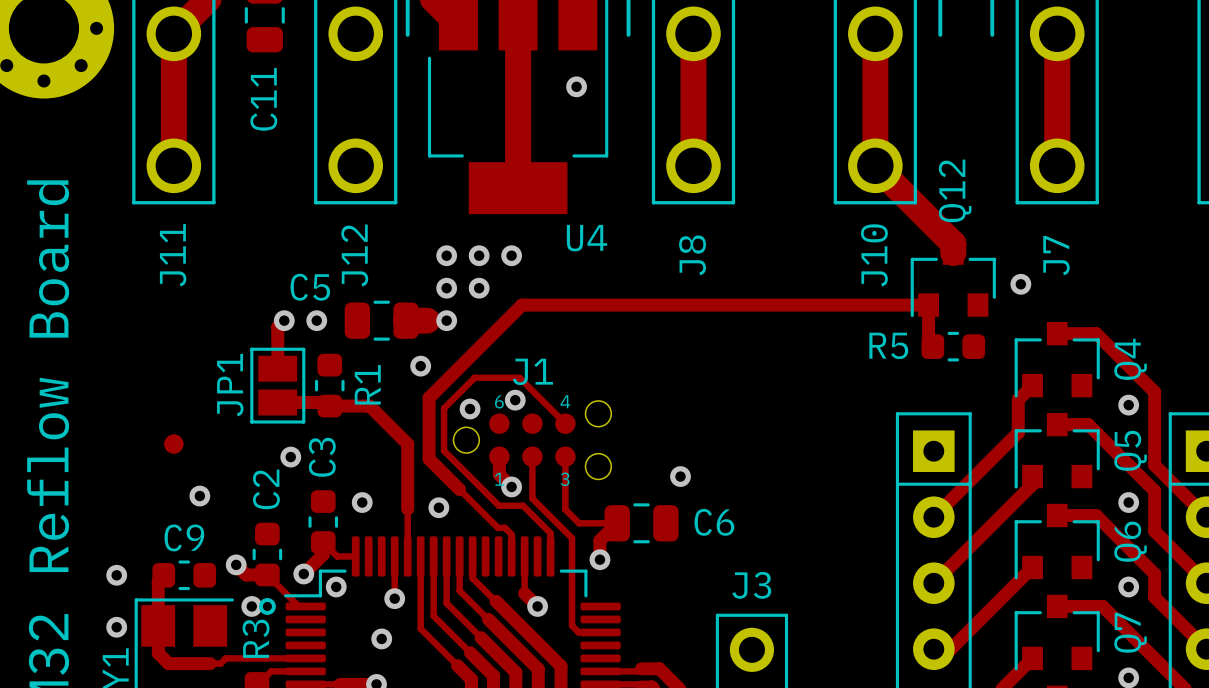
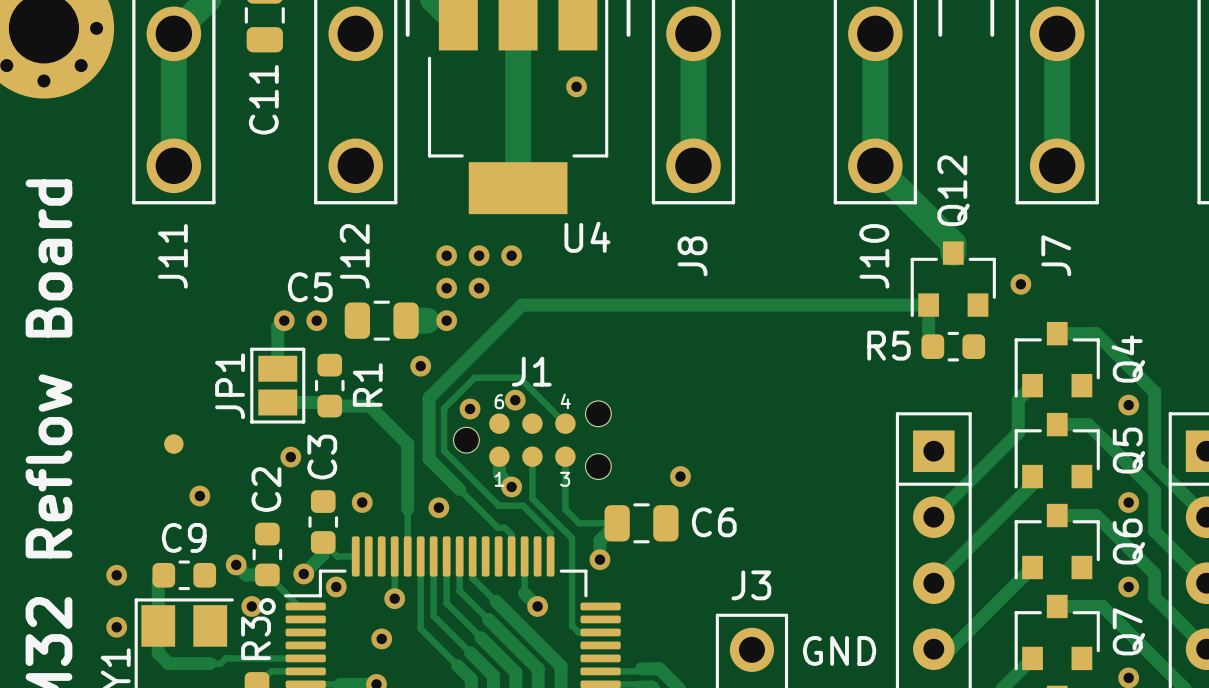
text: none -> GND (839, 650)

